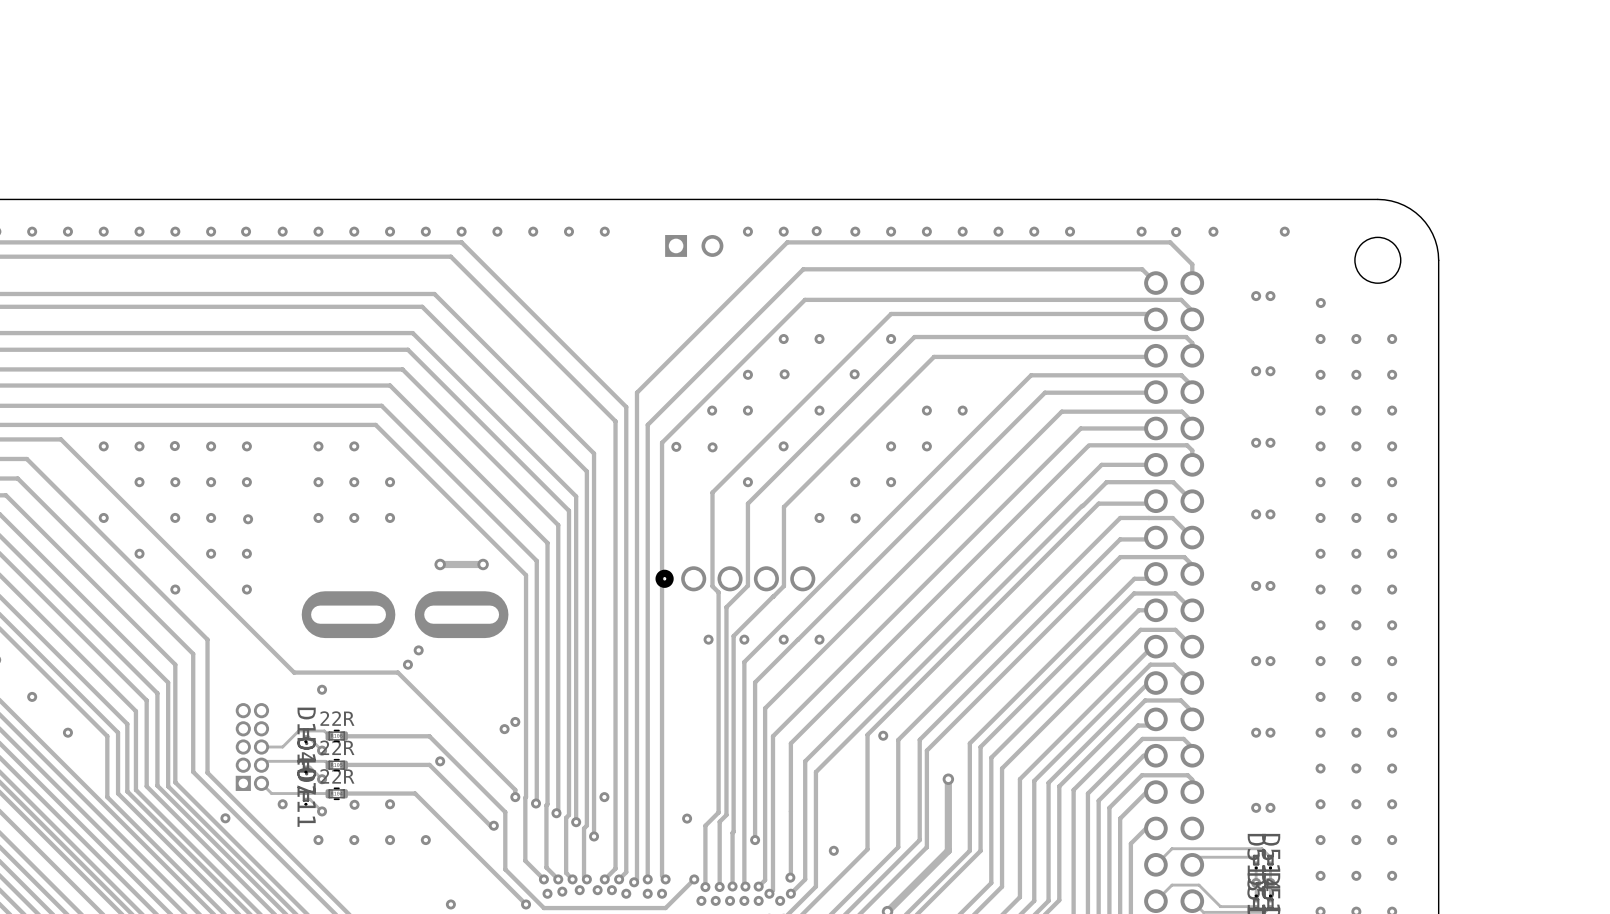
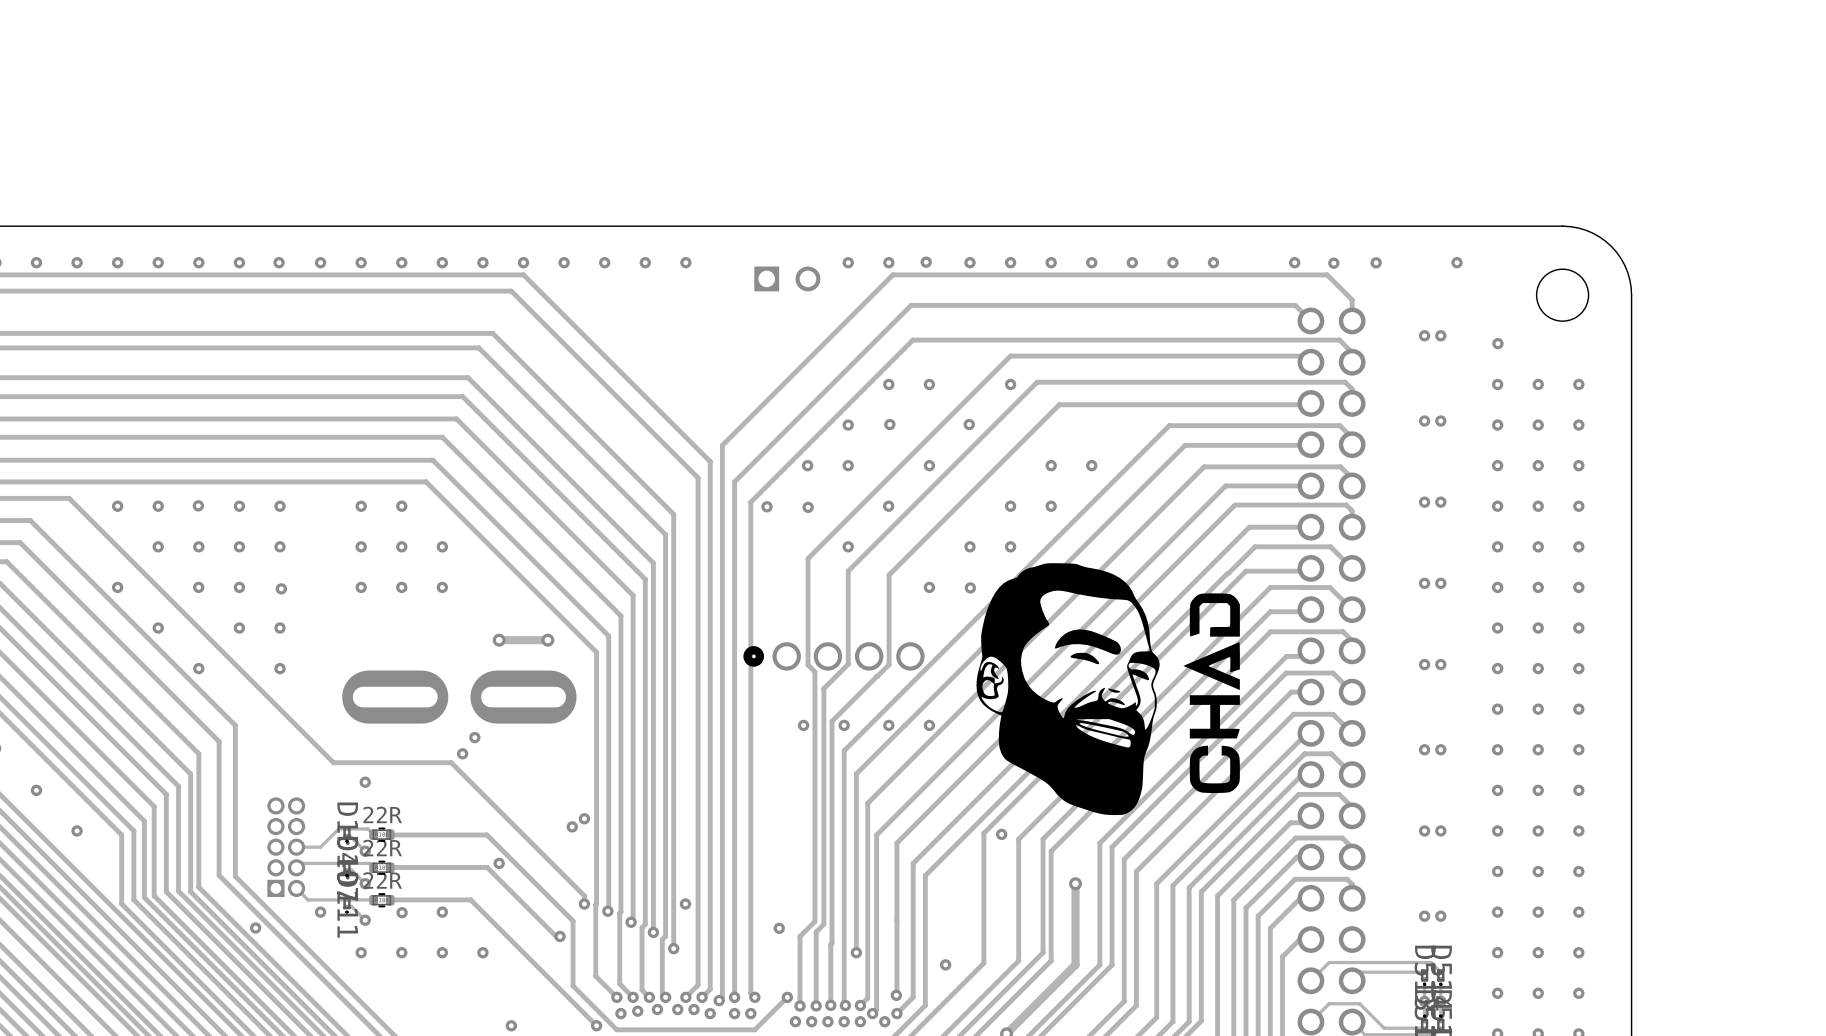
drawing: none -> [976, 563, 1240, 816]

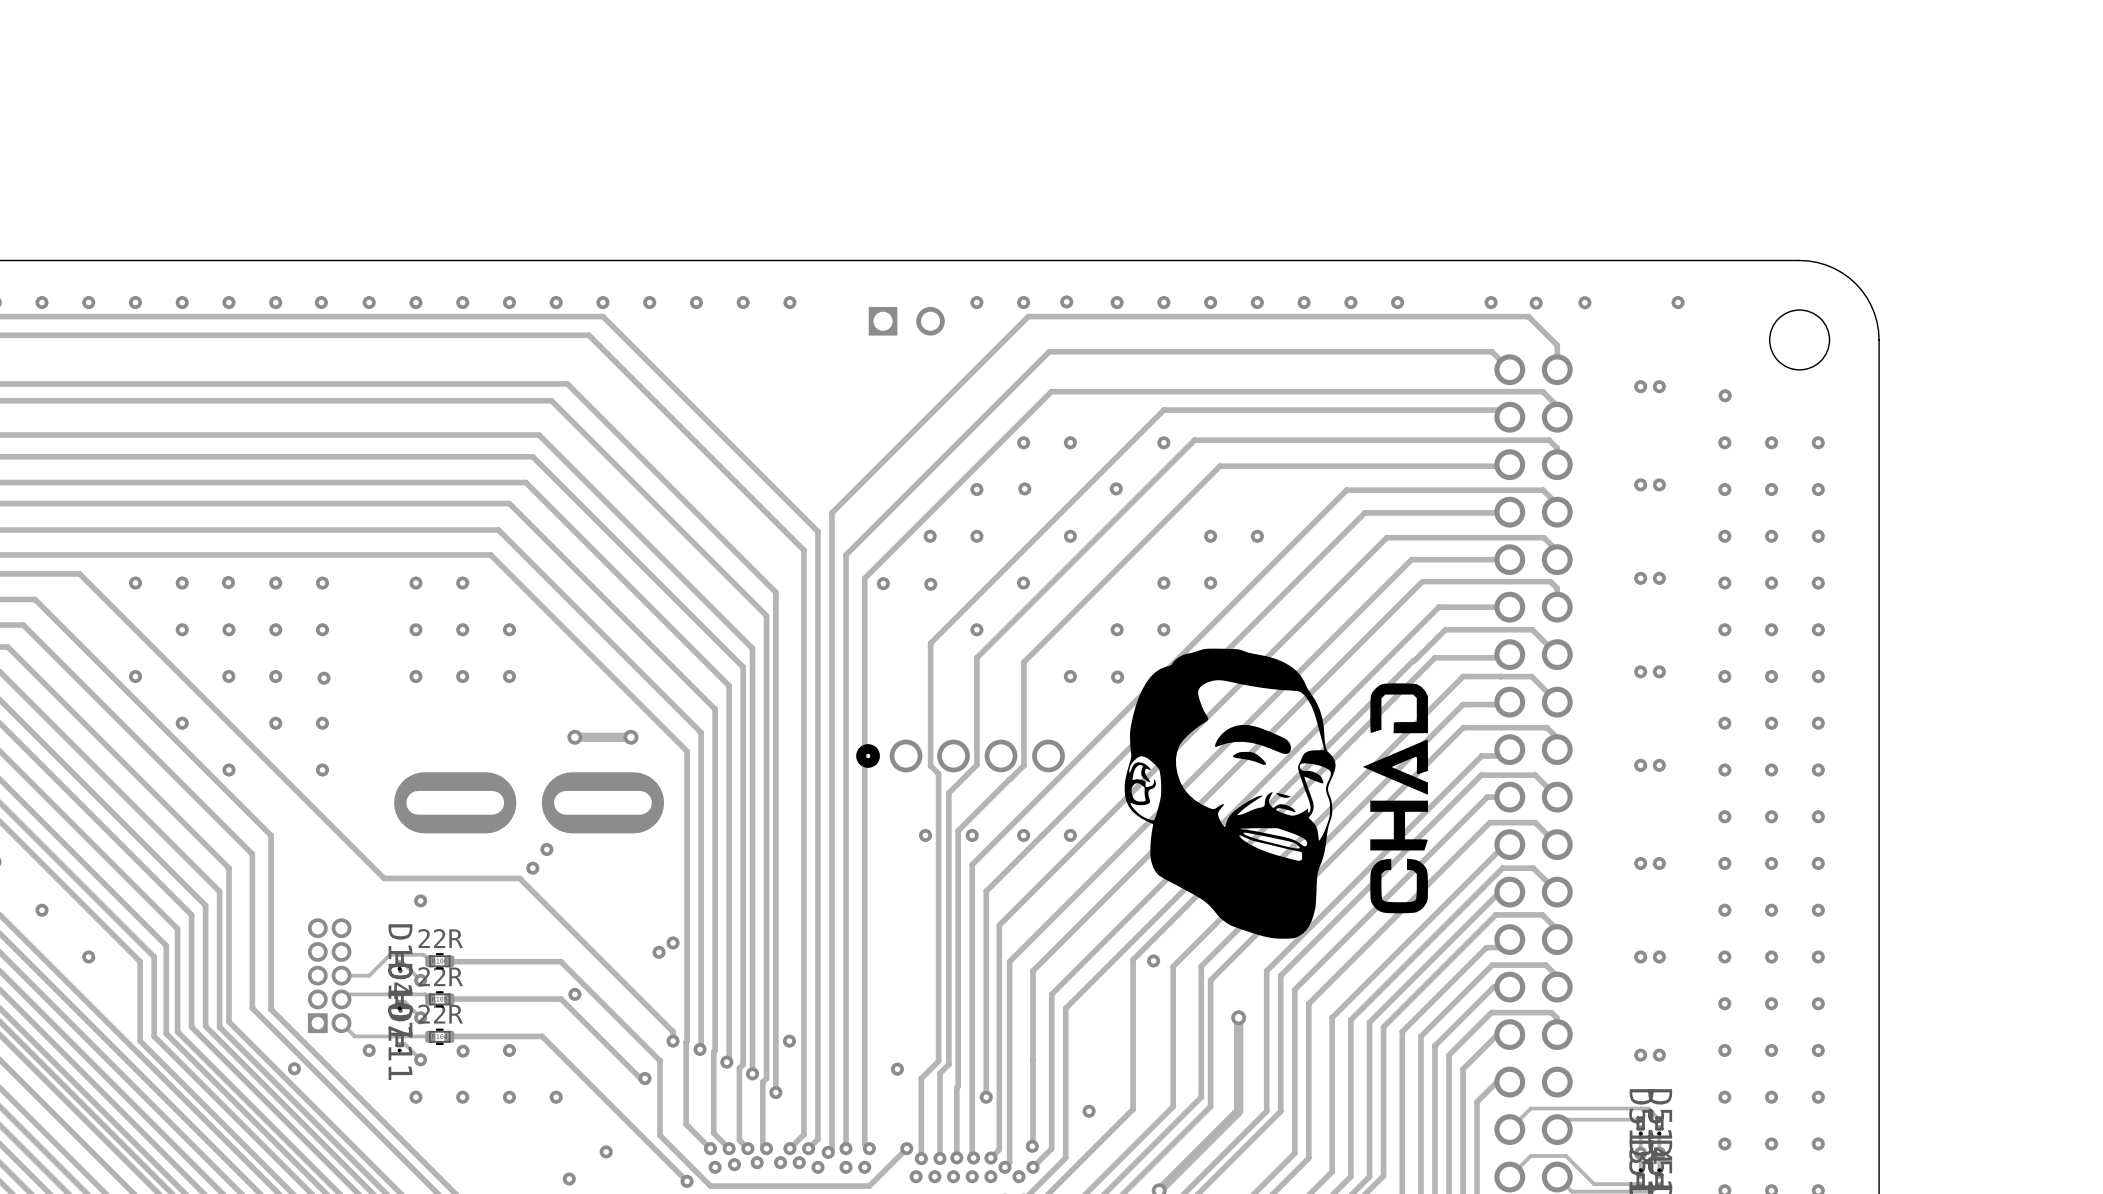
via: none -> (606, 1151)
via: none -> (569, 1179)
via: (511, 1025) -> none

